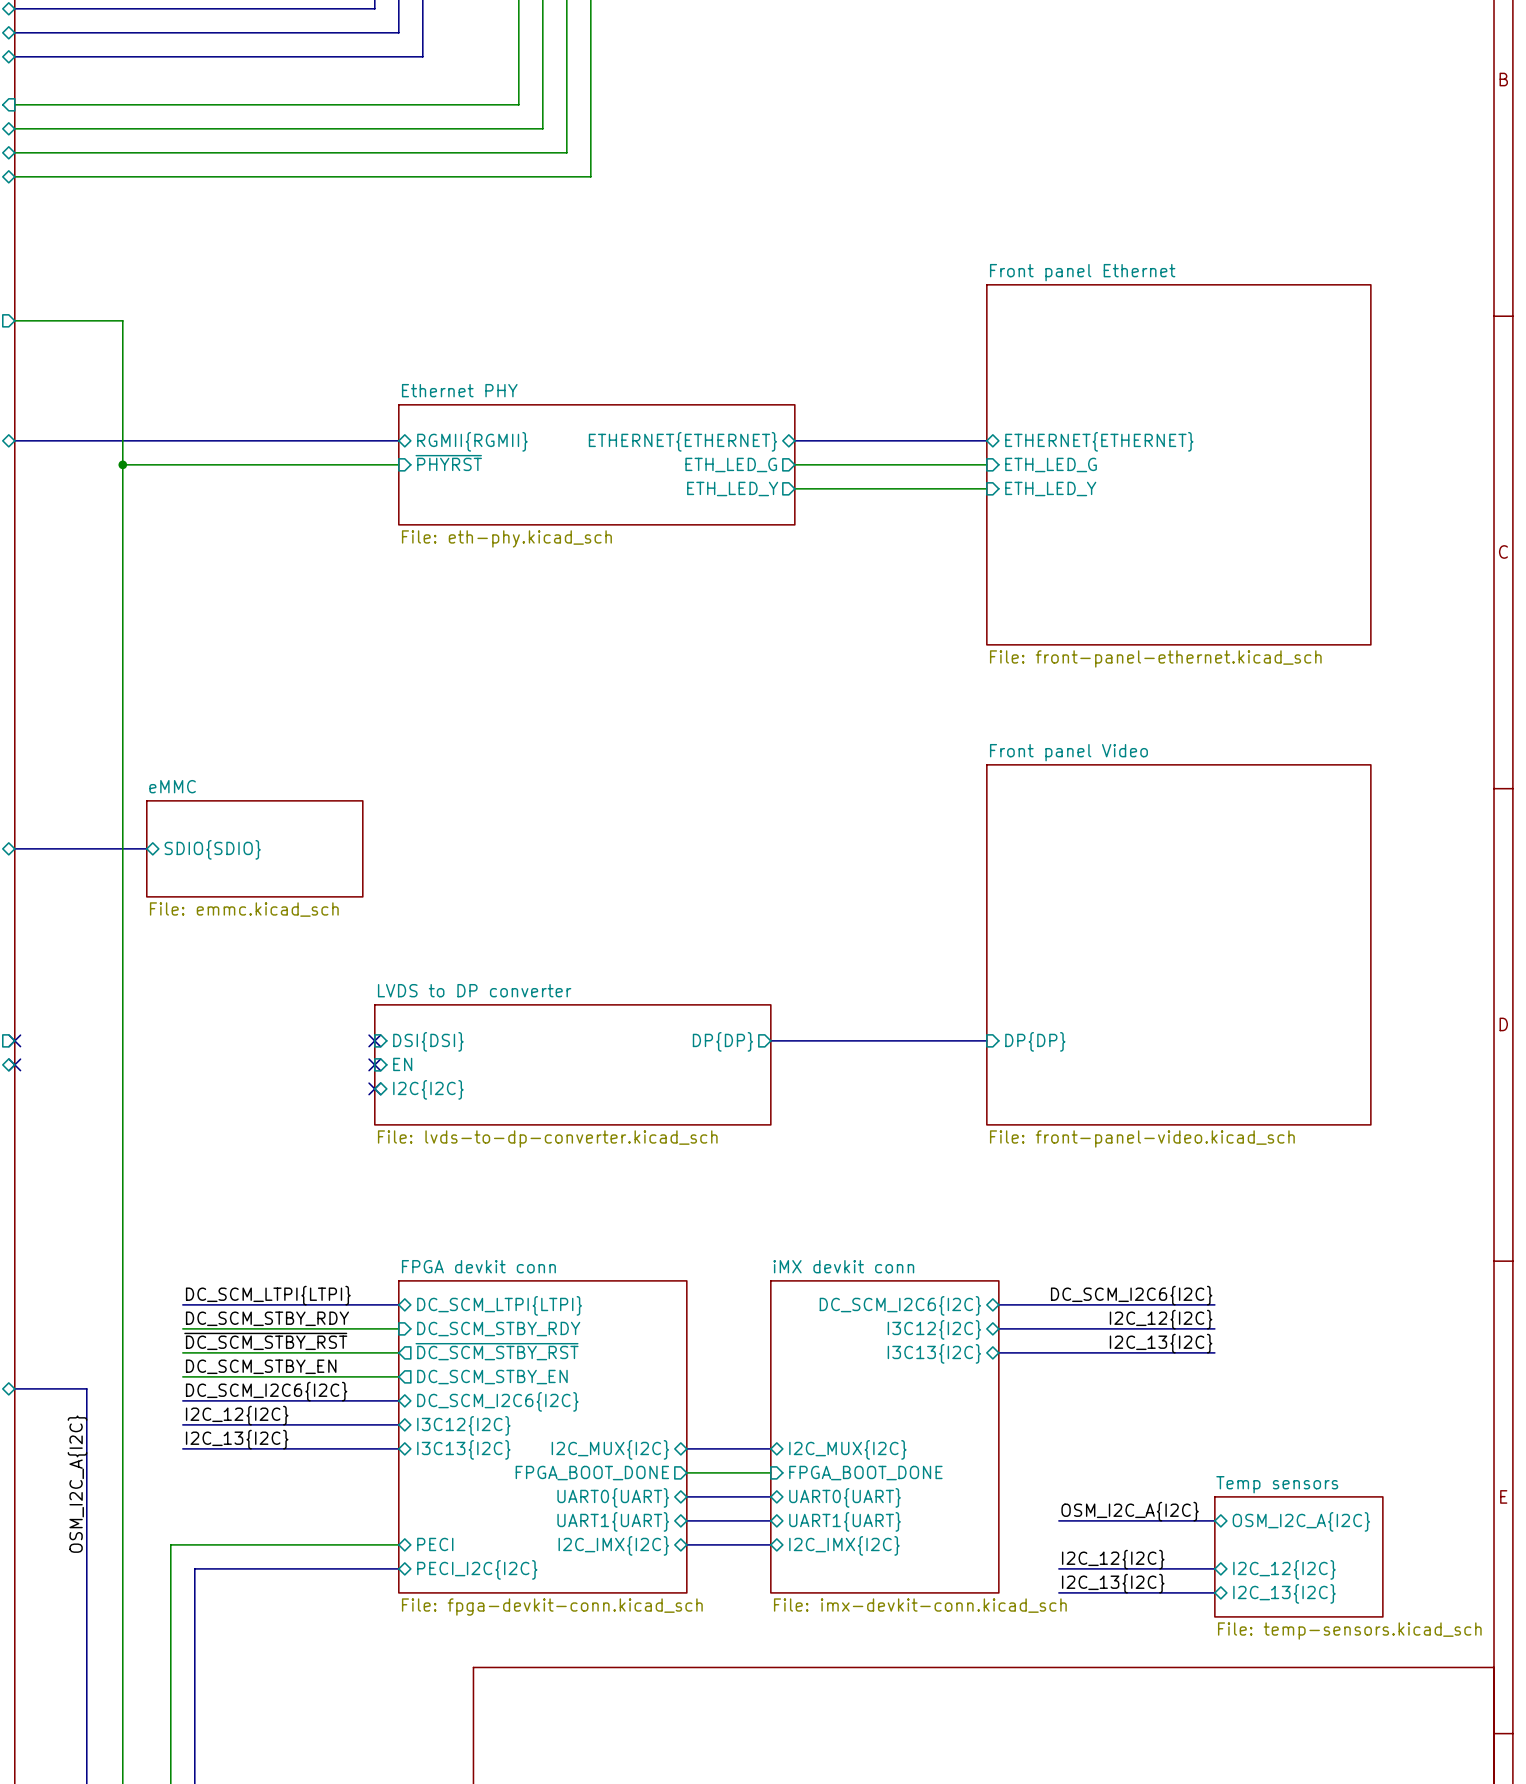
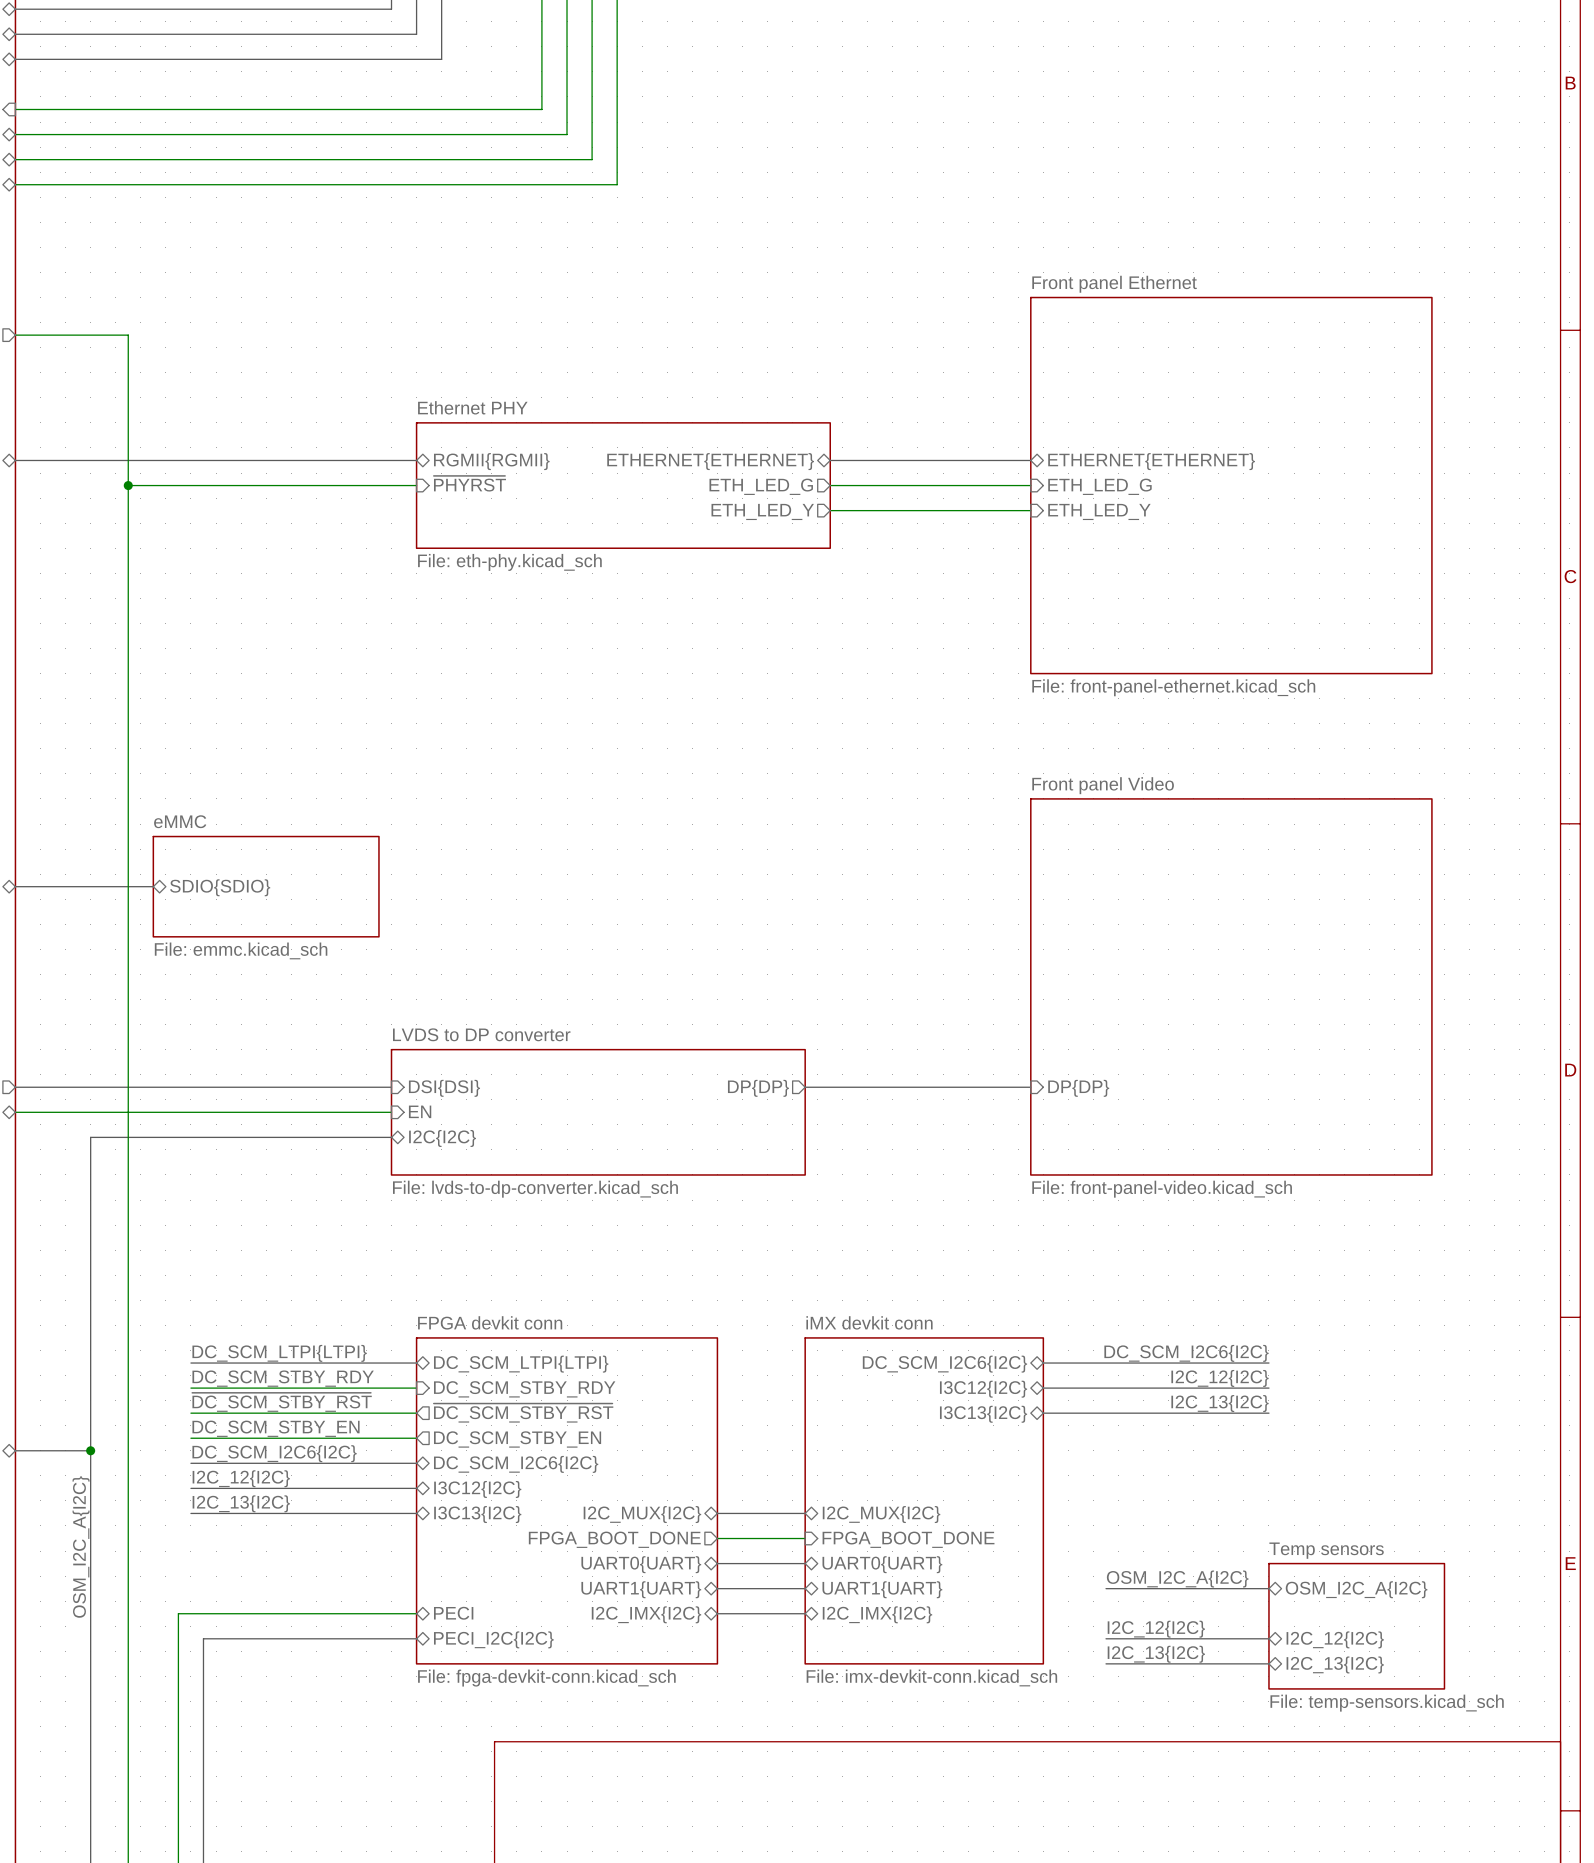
bus: none -> (15, 1087) (391, 1087)
no-connect mark: (14, 1040) -> none
no-connect mark: (374, 1040) -> none
wire: none -> (15, 1112) (391, 1112)
no-connect mark: (14, 1064) -> none
no-connect mark: (374, 1064) -> none
bus: none -> (391, 1137) (90, 1137) (90, 1450)
no-connect mark: (374, 1088) -> none
junction: none -> (90, 1450)

